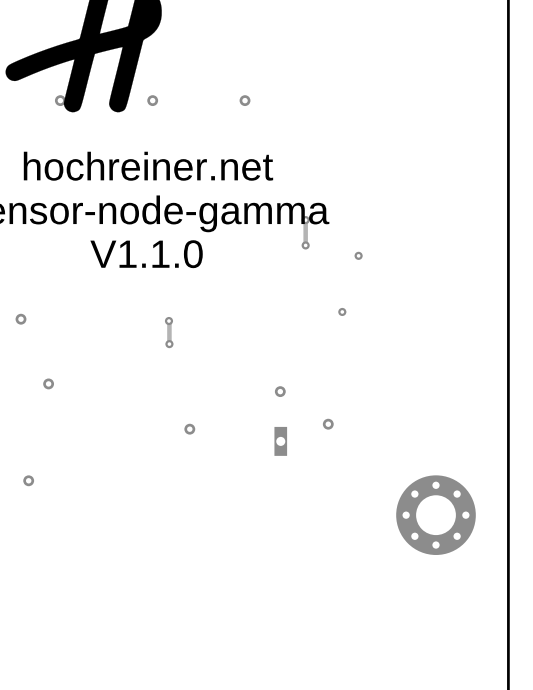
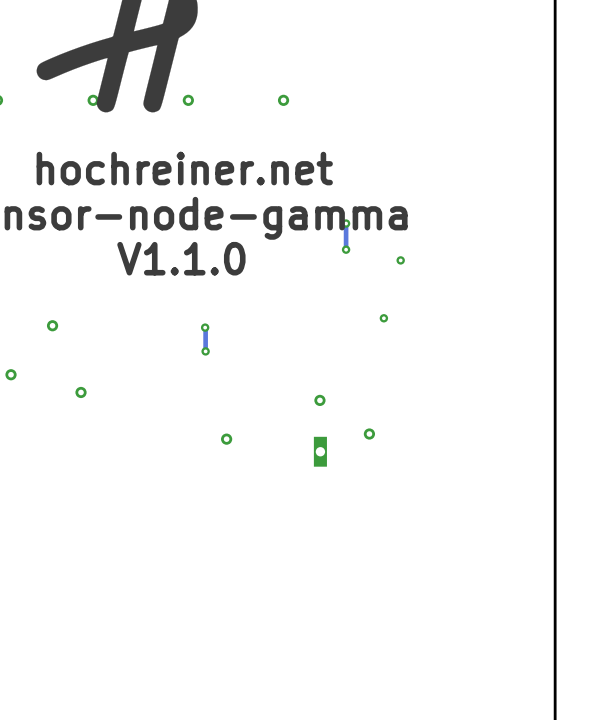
part: (28, 480) -> none
part: (436, 515) -> none

